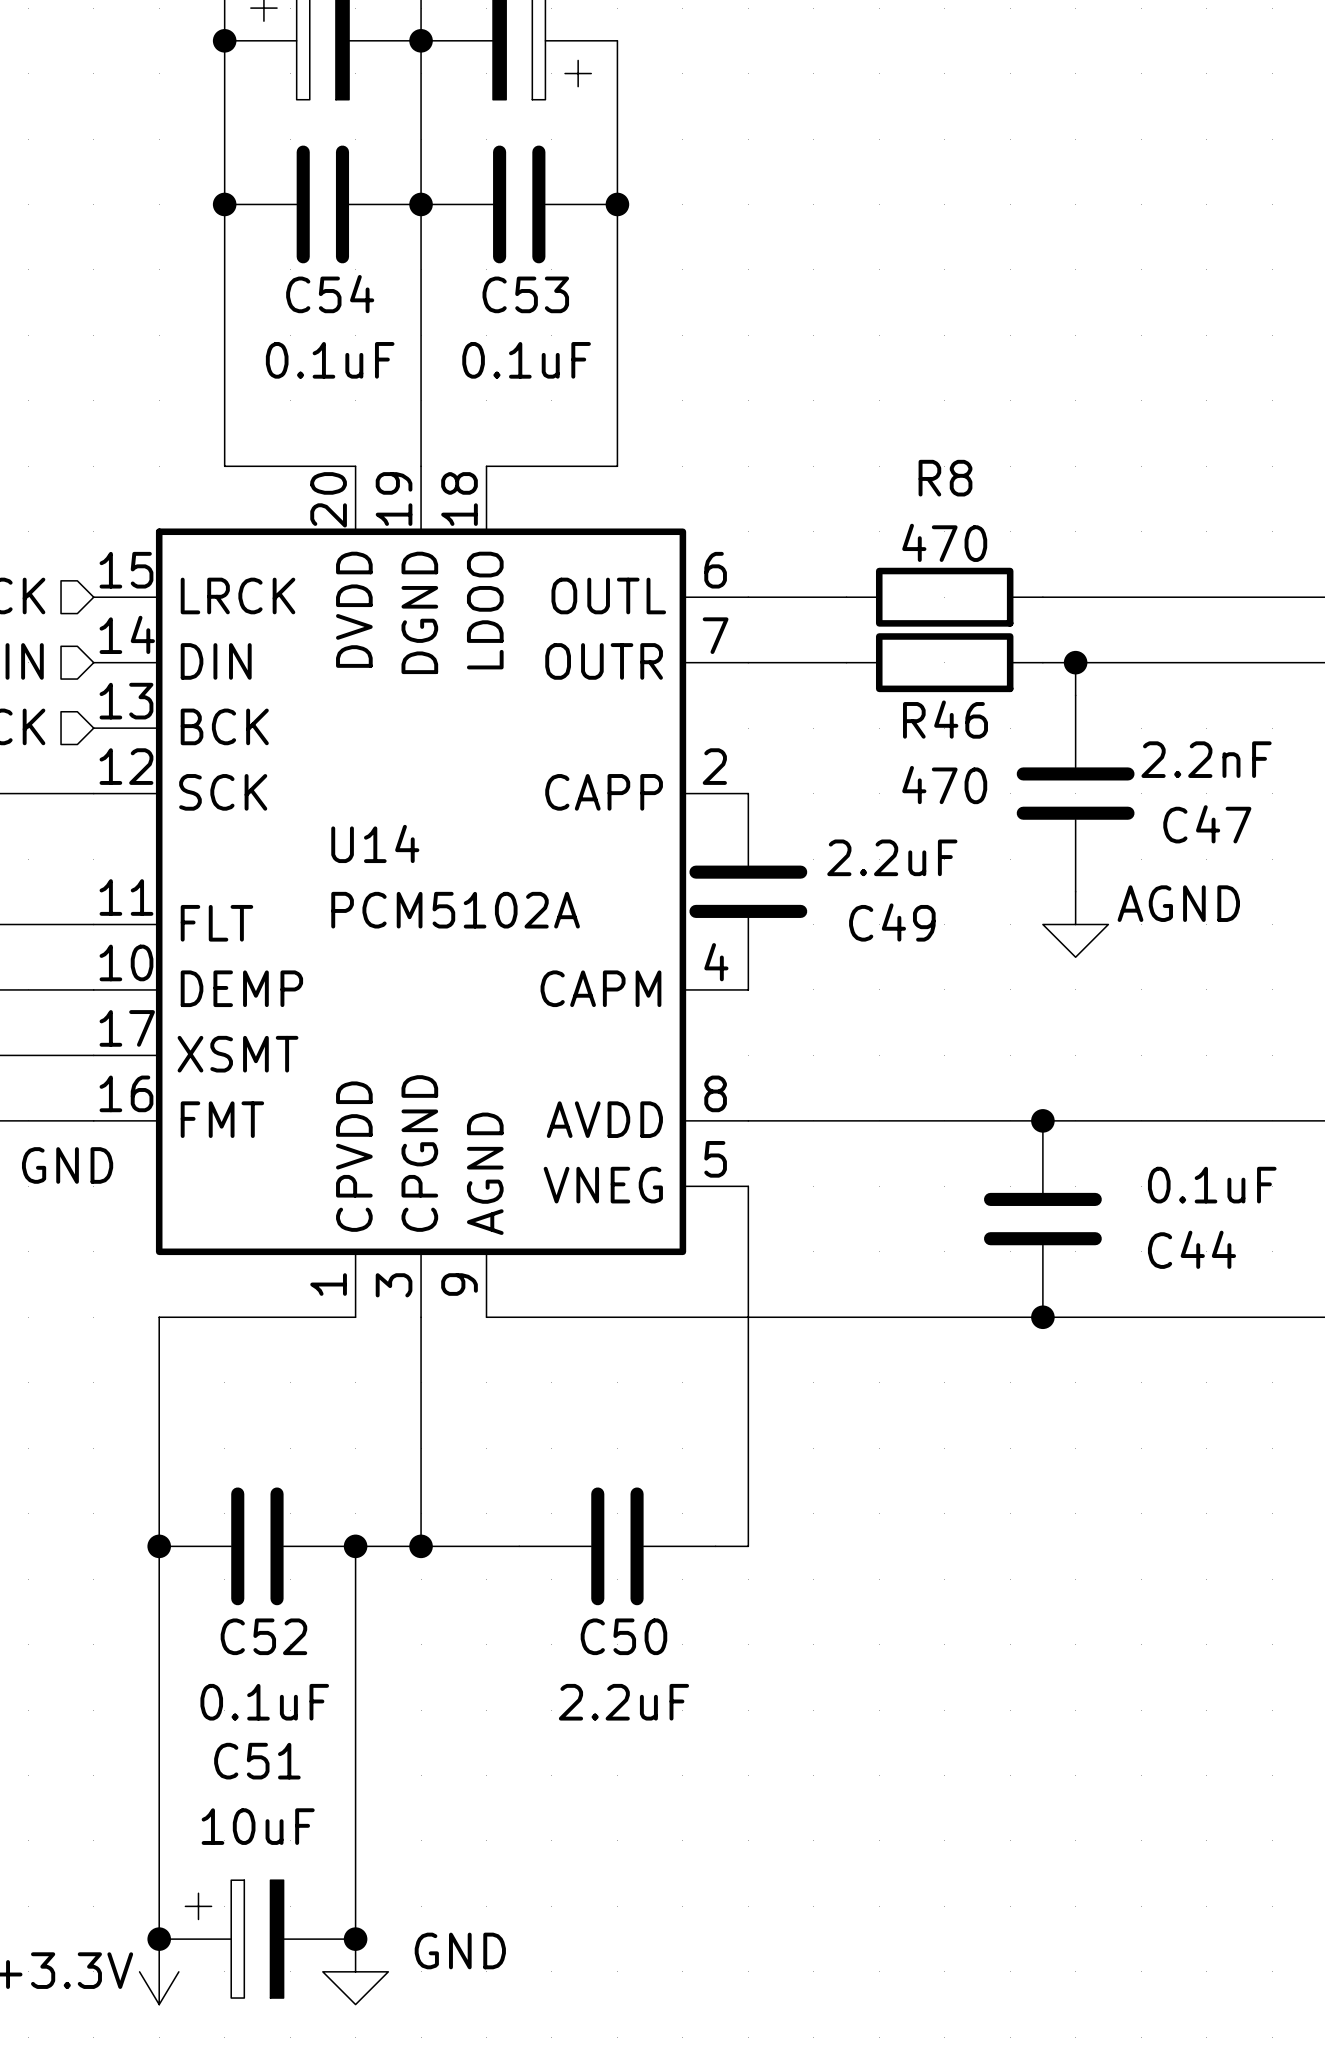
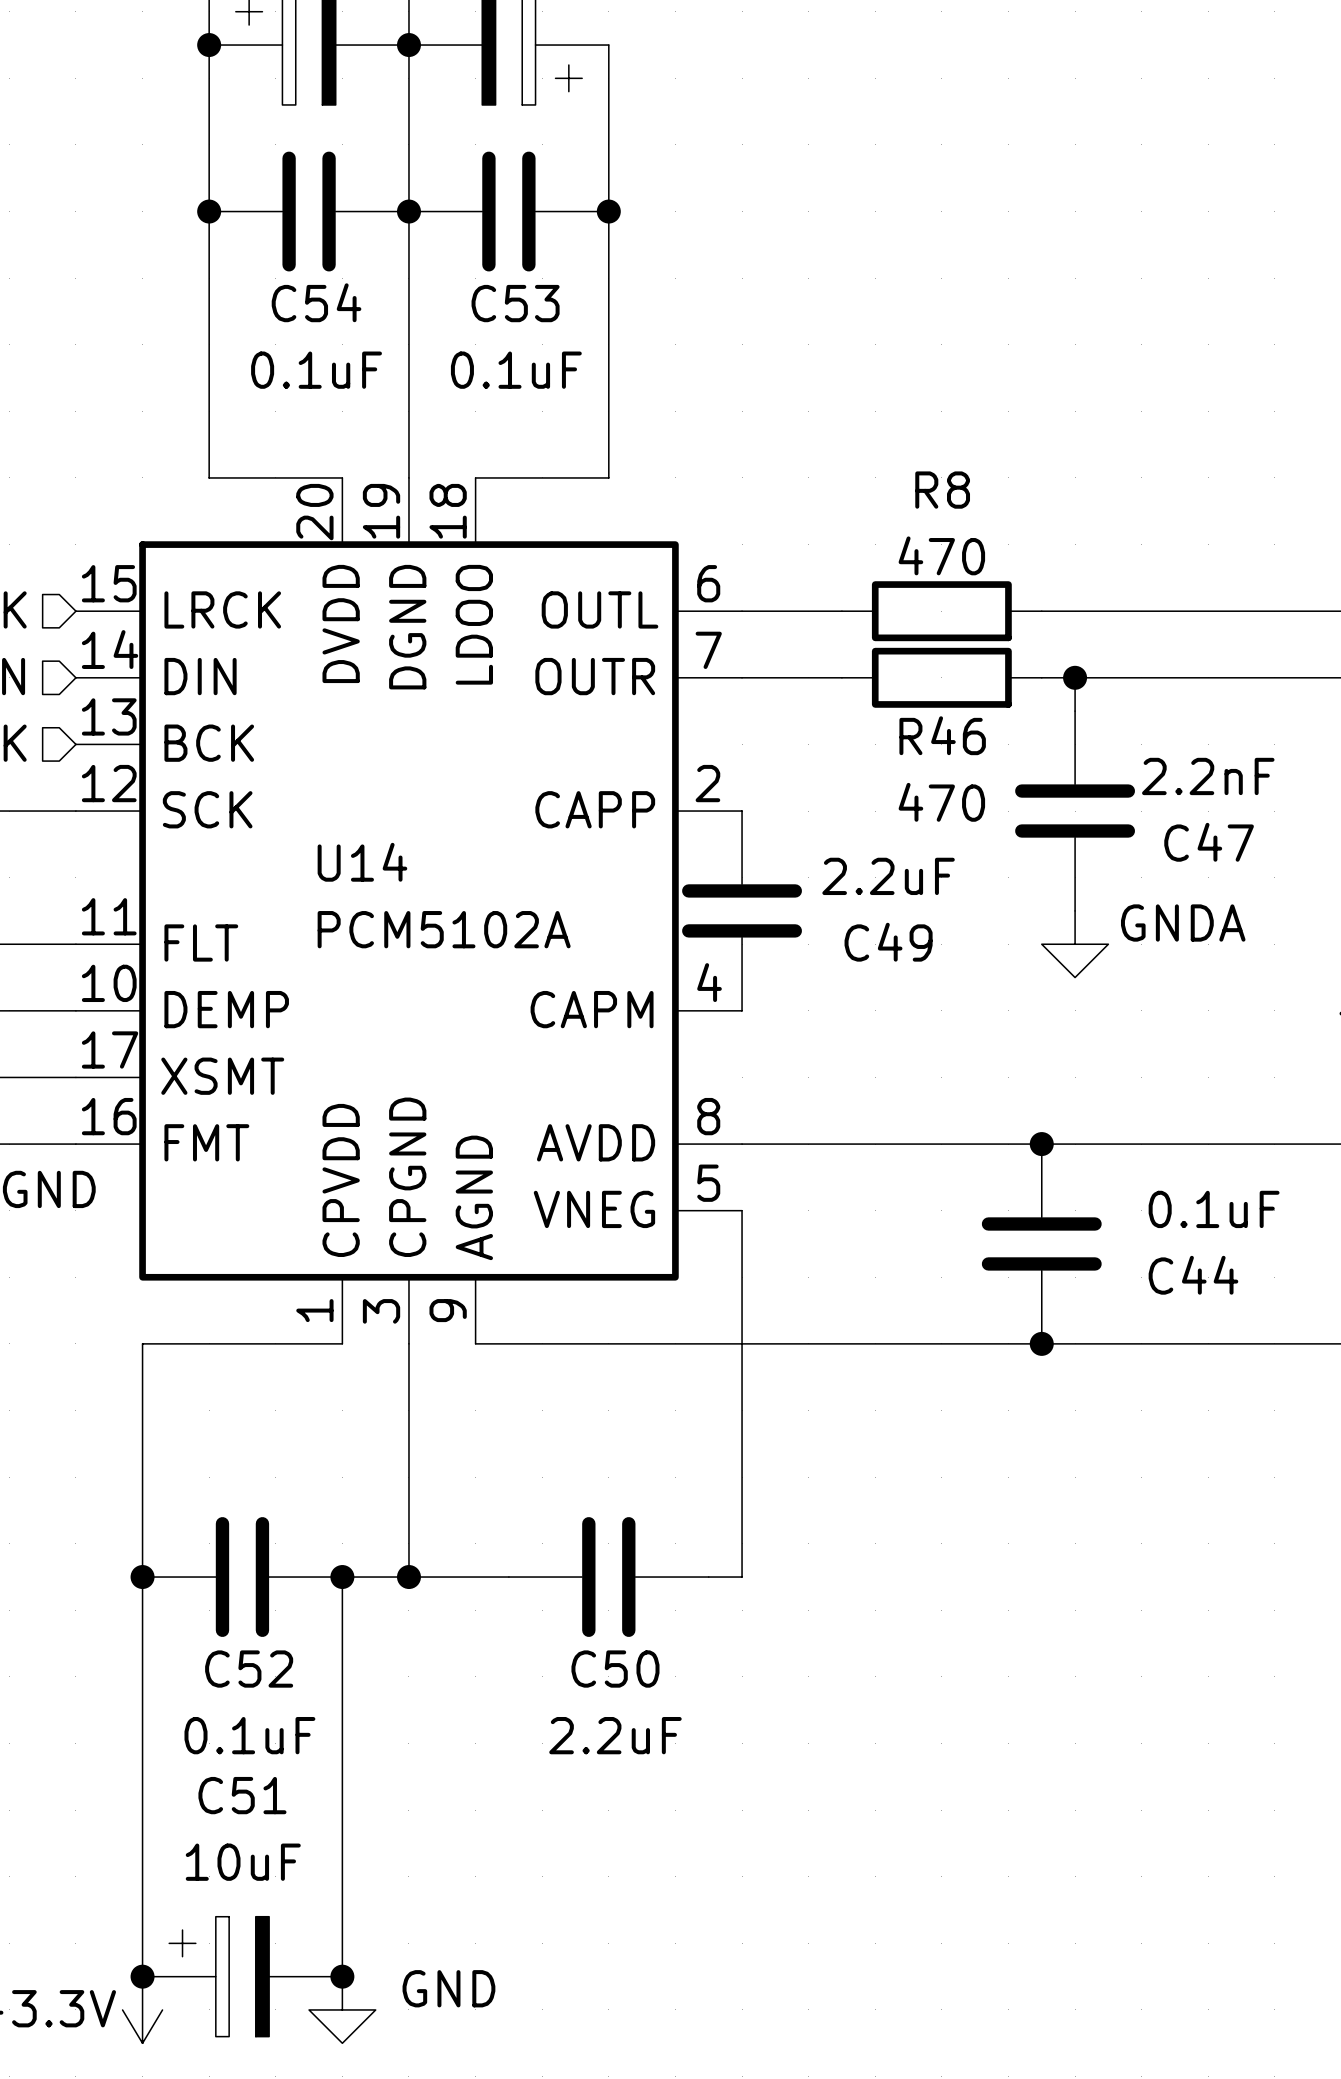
power symbol: AGND (1075, 924) -> GNDA (1075, 944)

